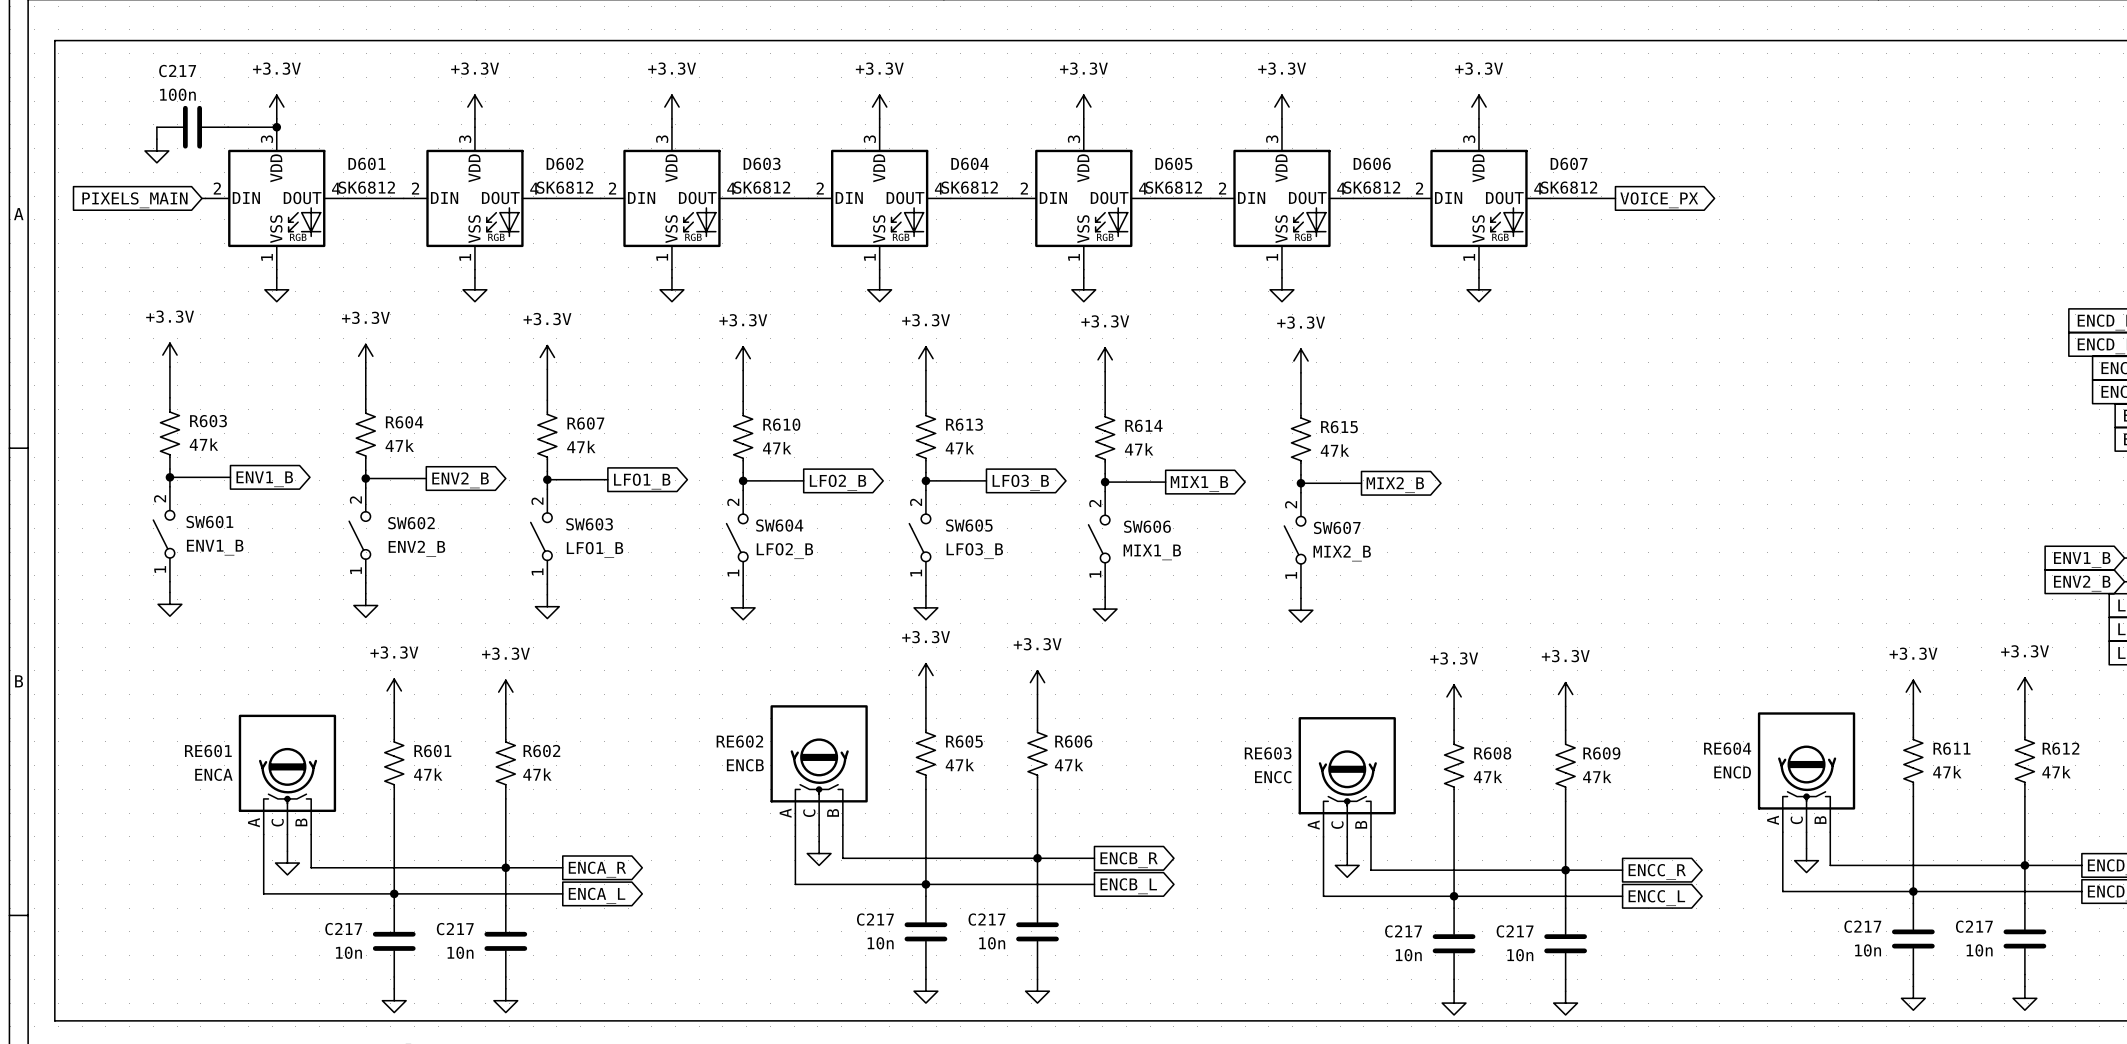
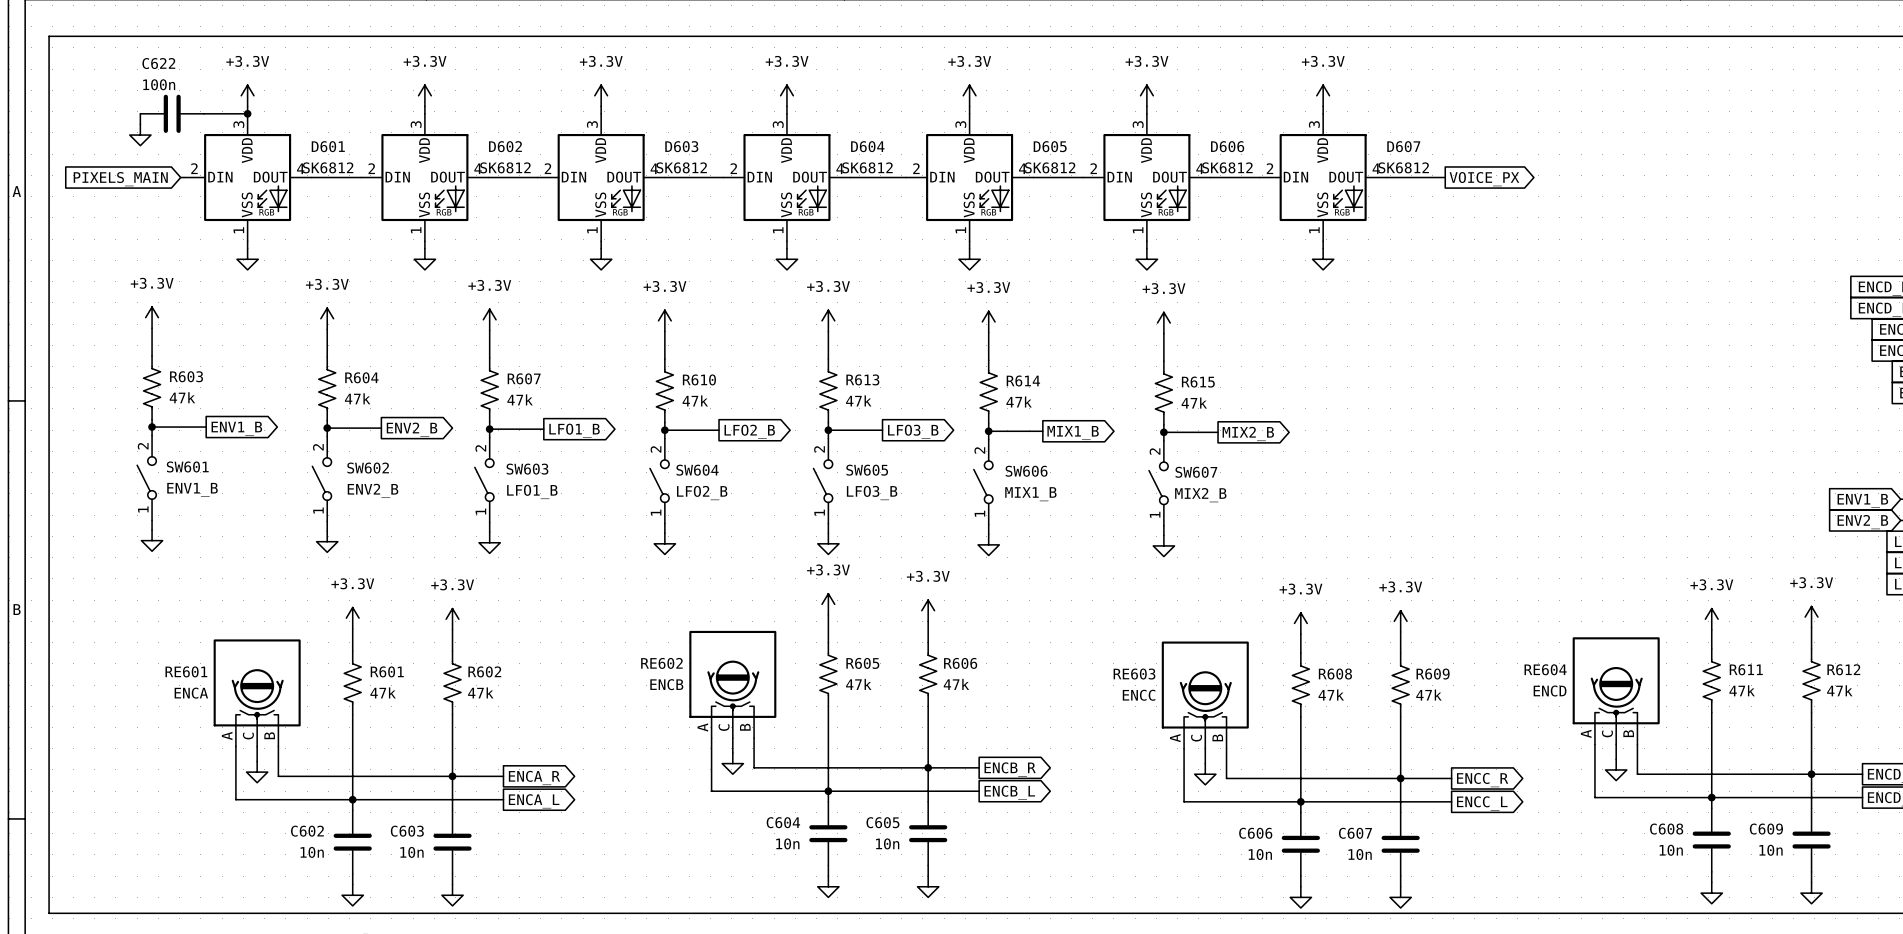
C217 name: C217 (177, 71) -> C622 (158, 63)
C217 name: C217 (875, 919) -> C604 (783, 822)
C217 name: C217 (986, 919) -> C605 (882, 822)
C217 name: C217 (1862, 926) -> C608 (1666, 829)
C217 name: C217 (1974, 926) -> C609 (1766, 829)
C217 name: C217 (343, 929) -> C602 (307, 831)
C217 name: C217 (455, 929) -> C603 (407, 831)
C217 name: C217 (1403, 931) -> C606 (1255, 833)
C217 name: C217 (1515, 931) -> C607 (1355, 833)

